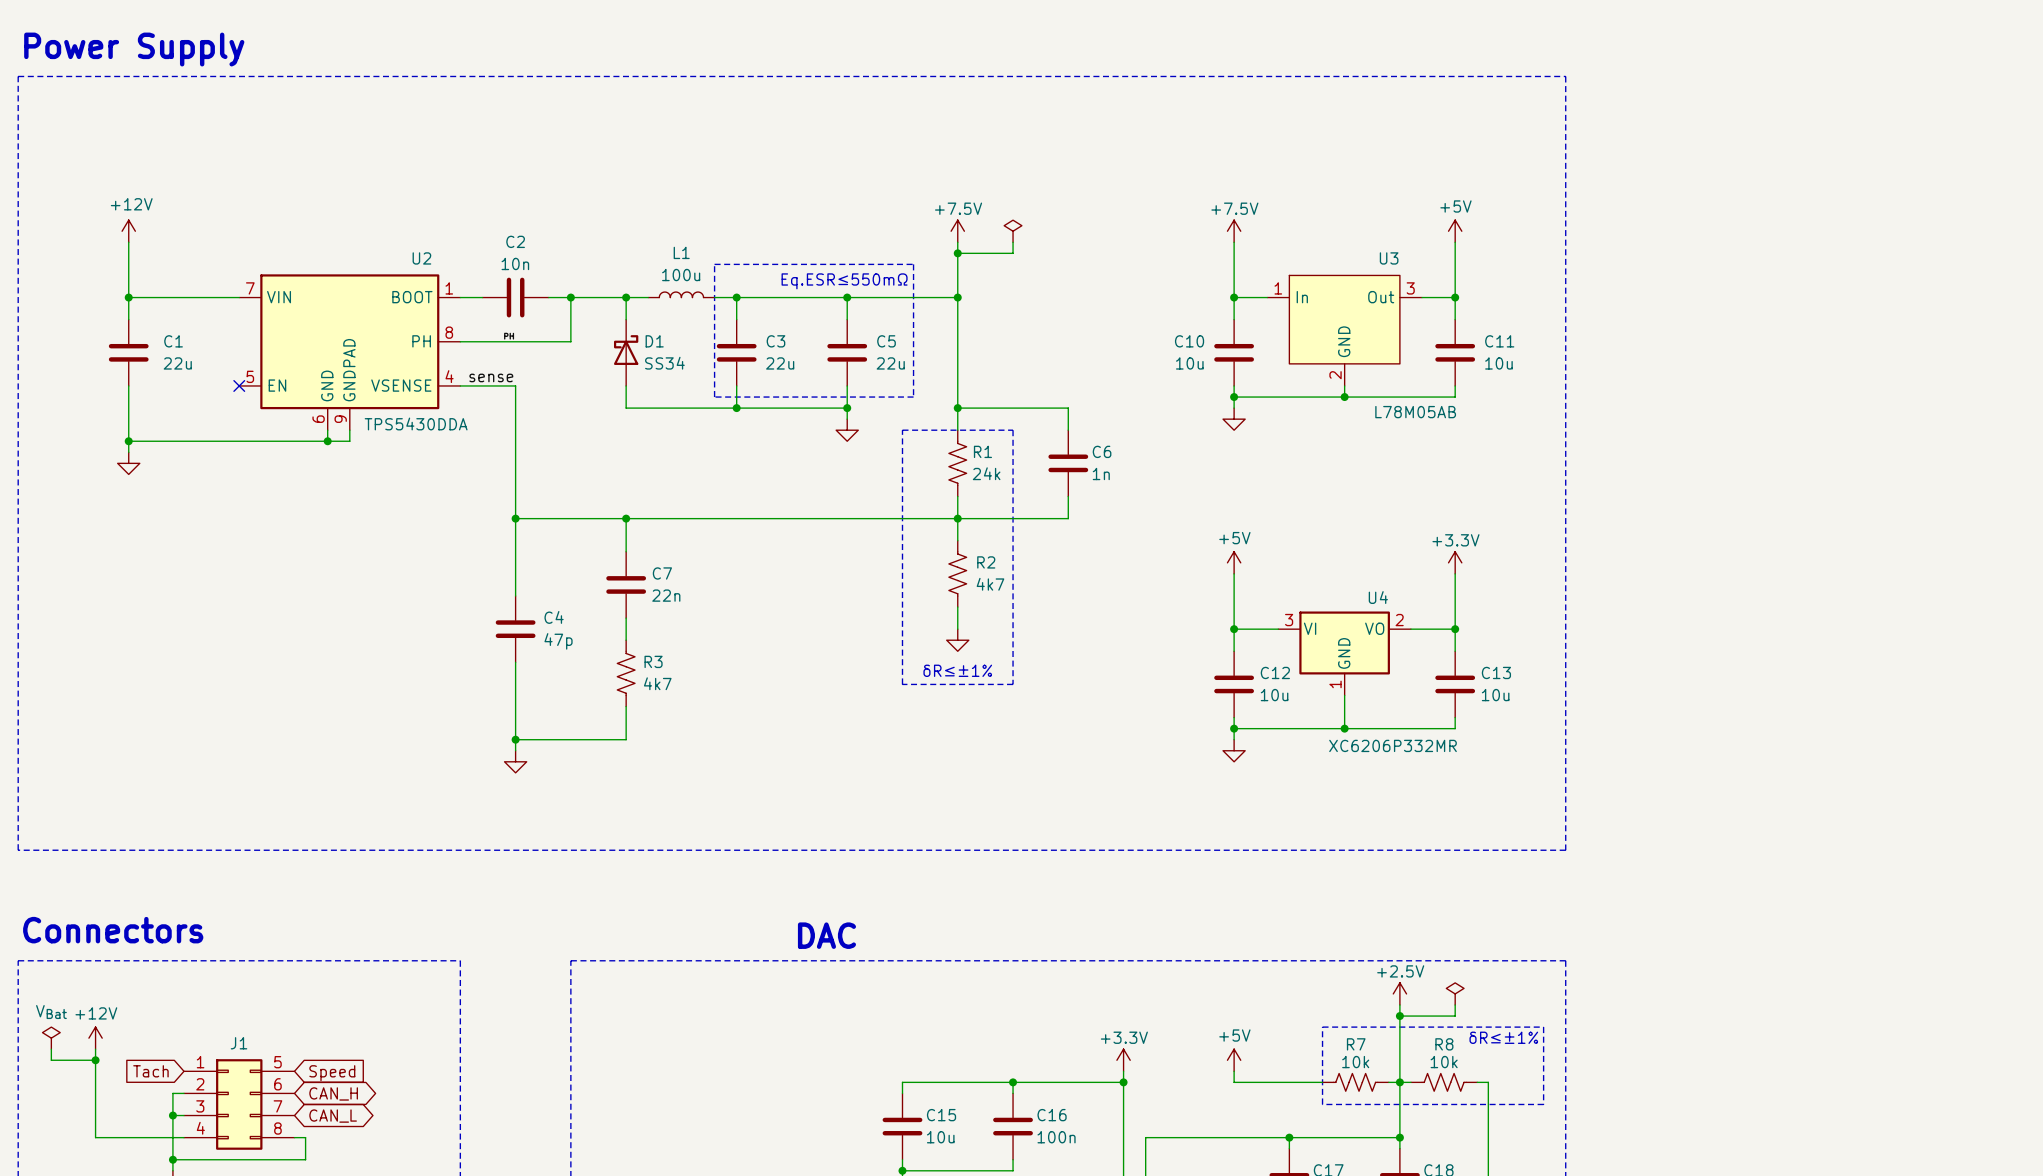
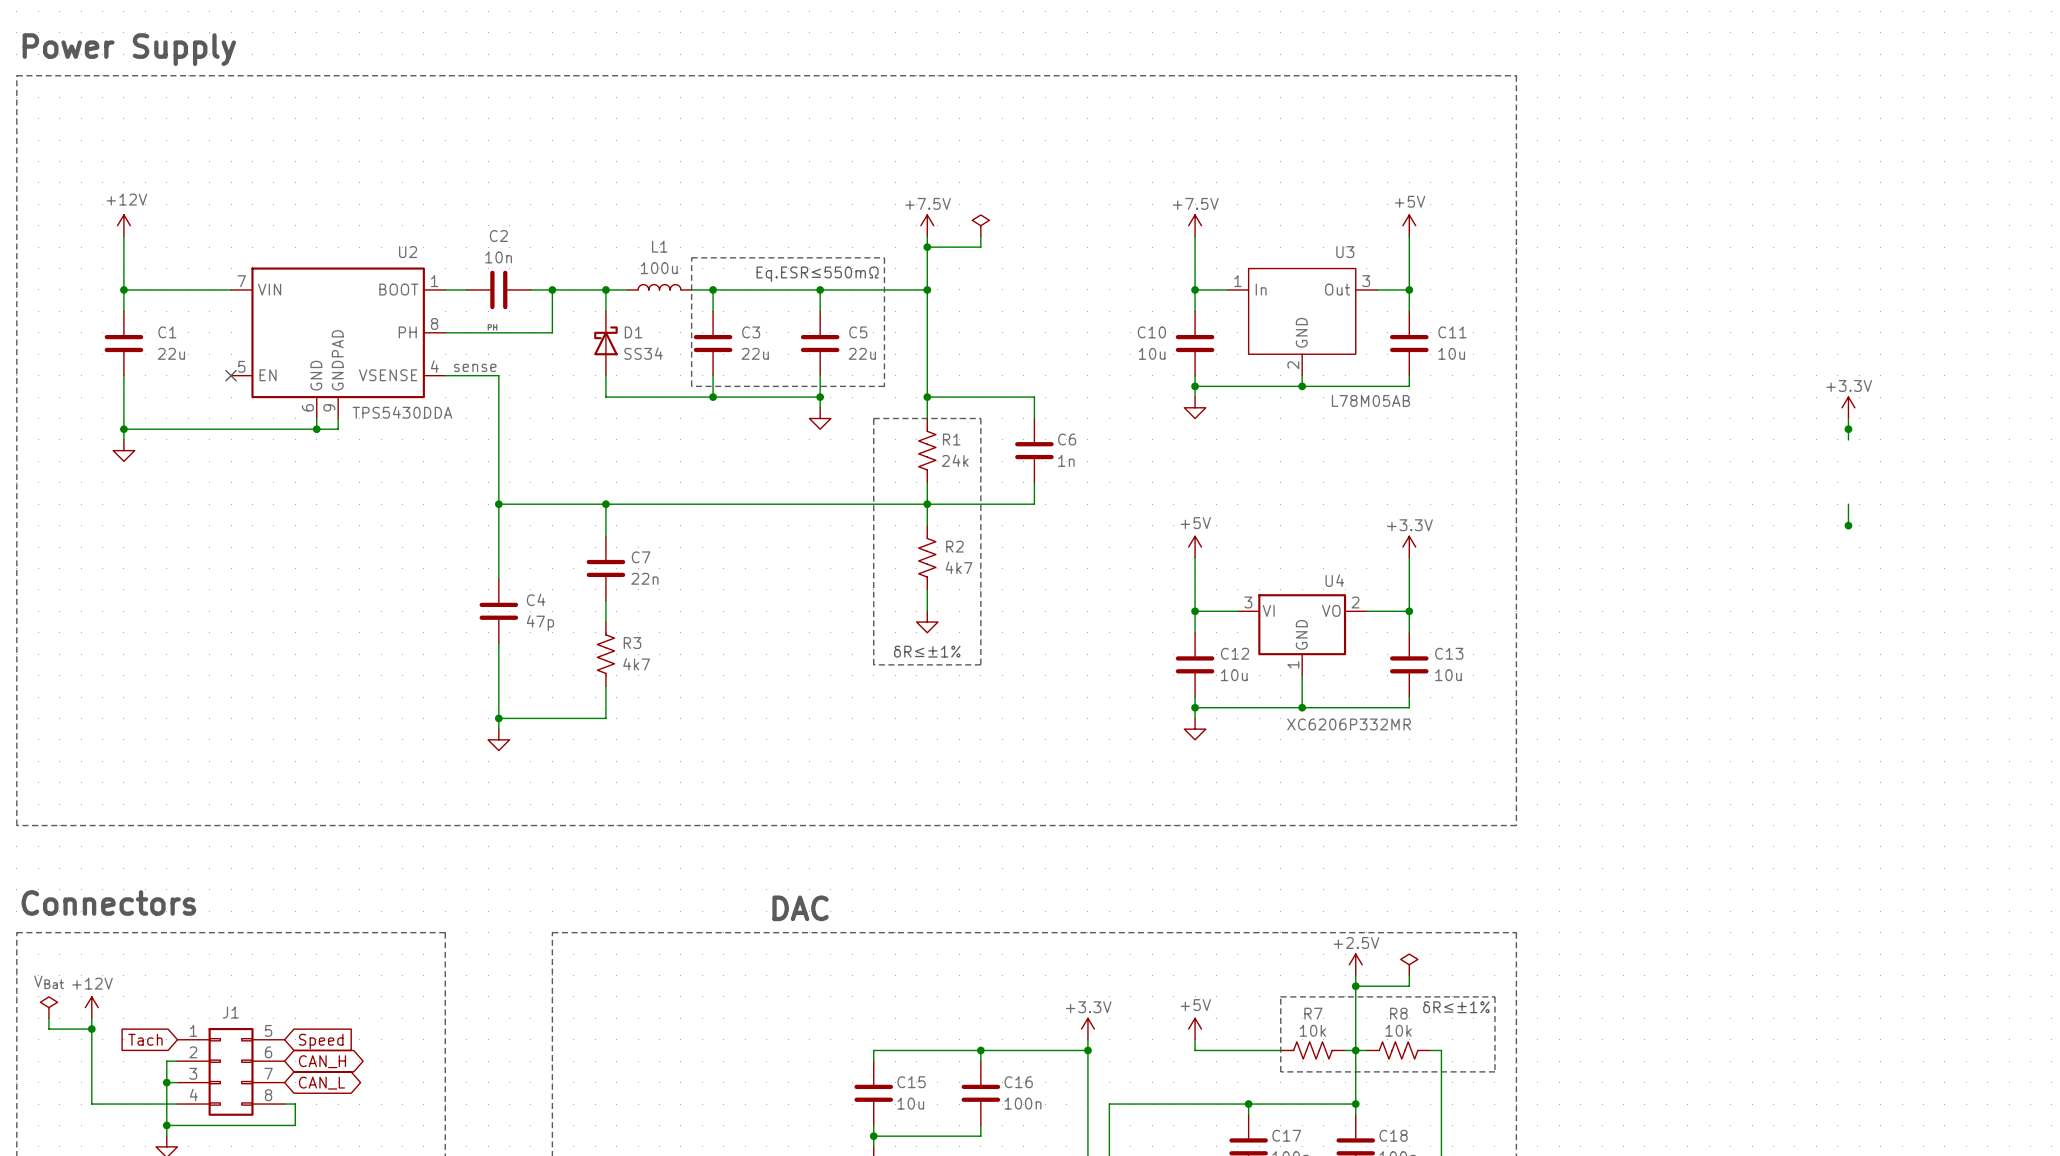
power symbol: none -> +3.3V (1848, 407)
wire: none -> (1848, 418) (1848, 439)
junction: none -> (1848, 429)
wire: none -> (1848, 504) (1848, 525)
junction: none -> (1848, 525)

